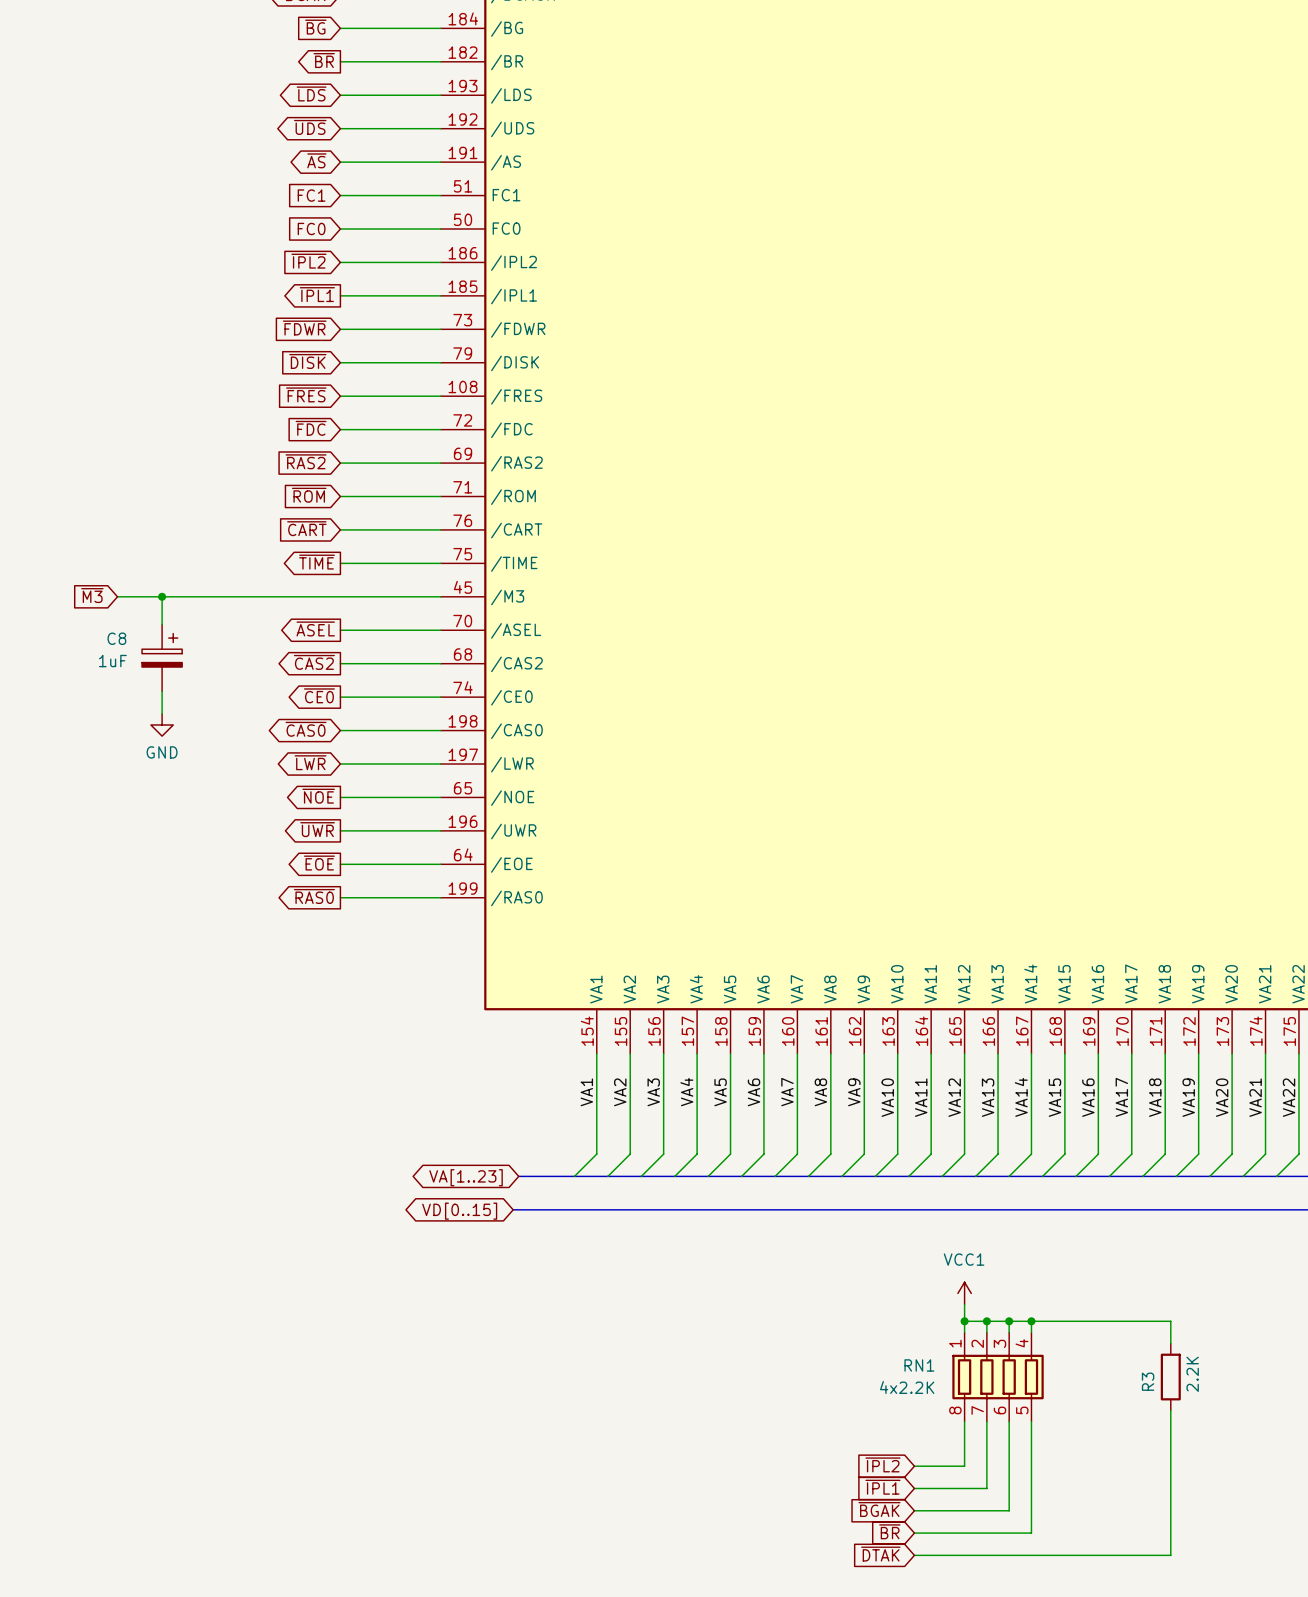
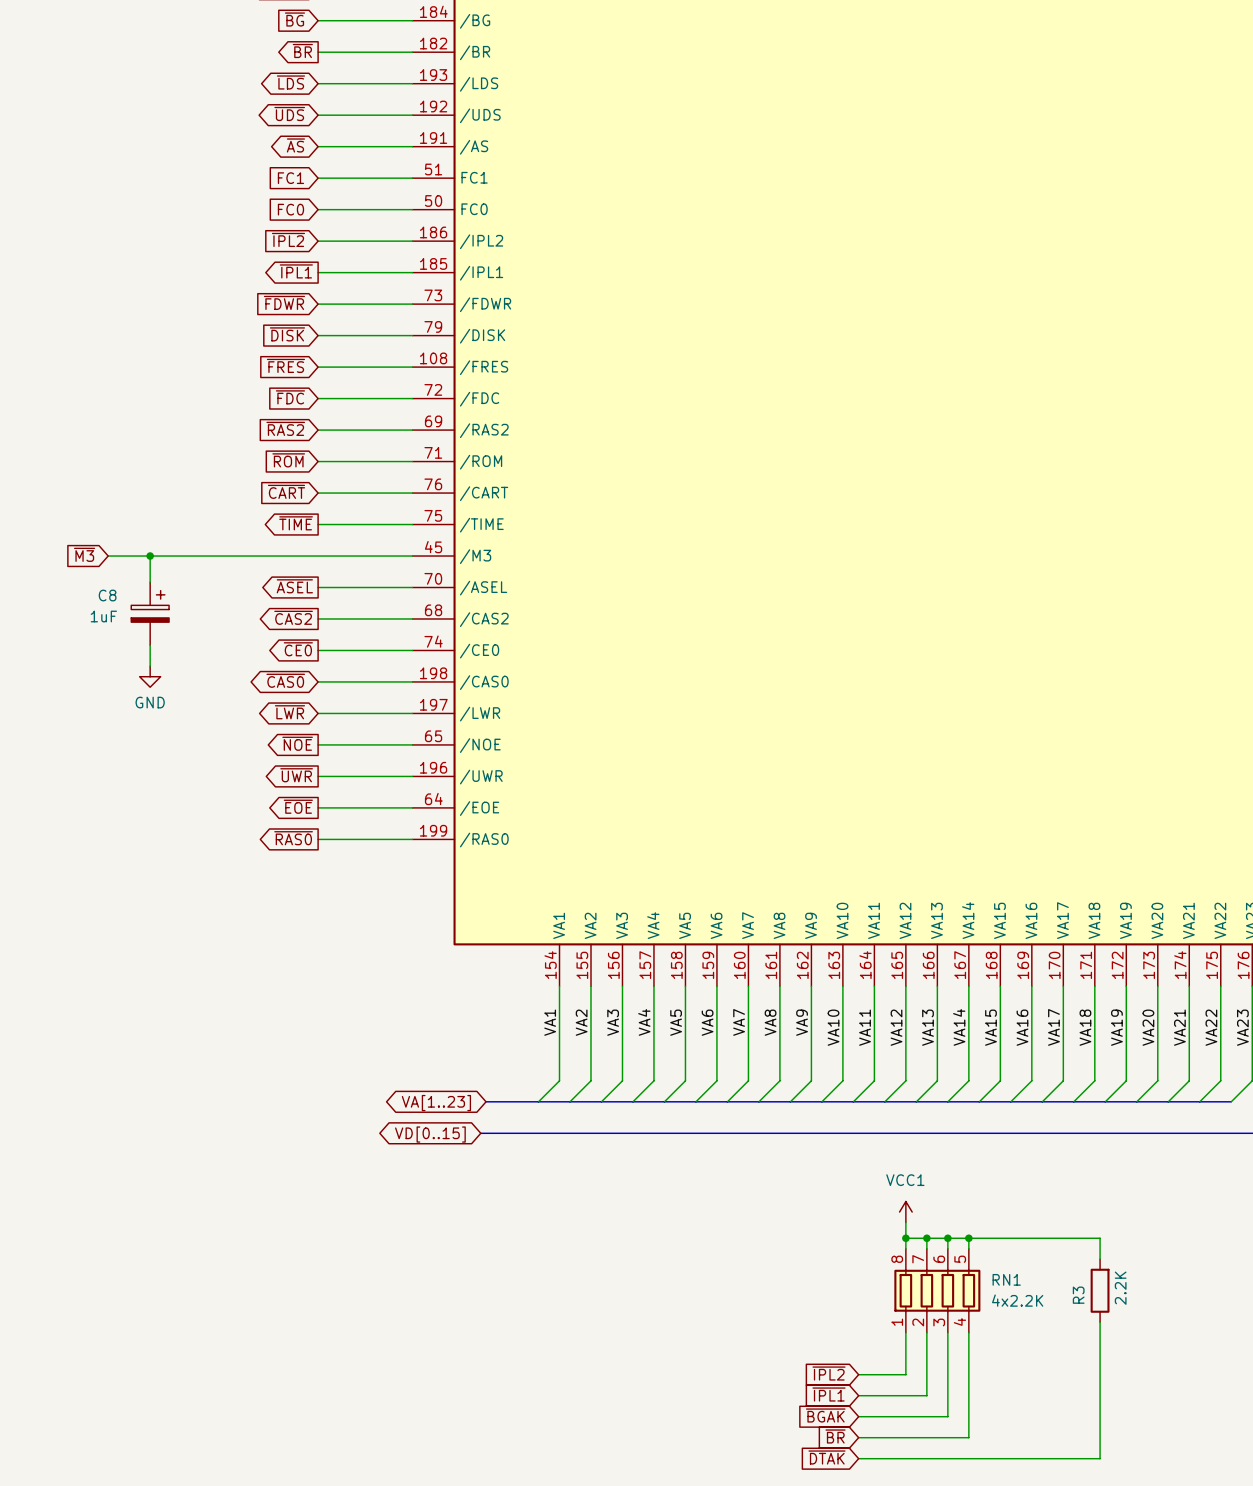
RN1 name position: RN1 (919, 1365) -> RN1 (1006, 1279)
RN1 flip: as is (998, 1377) -> up-down (937, 1290)
RN1 value position: 4x2.2K (907, 1387) -> 4x2.2K (1017, 1300)

